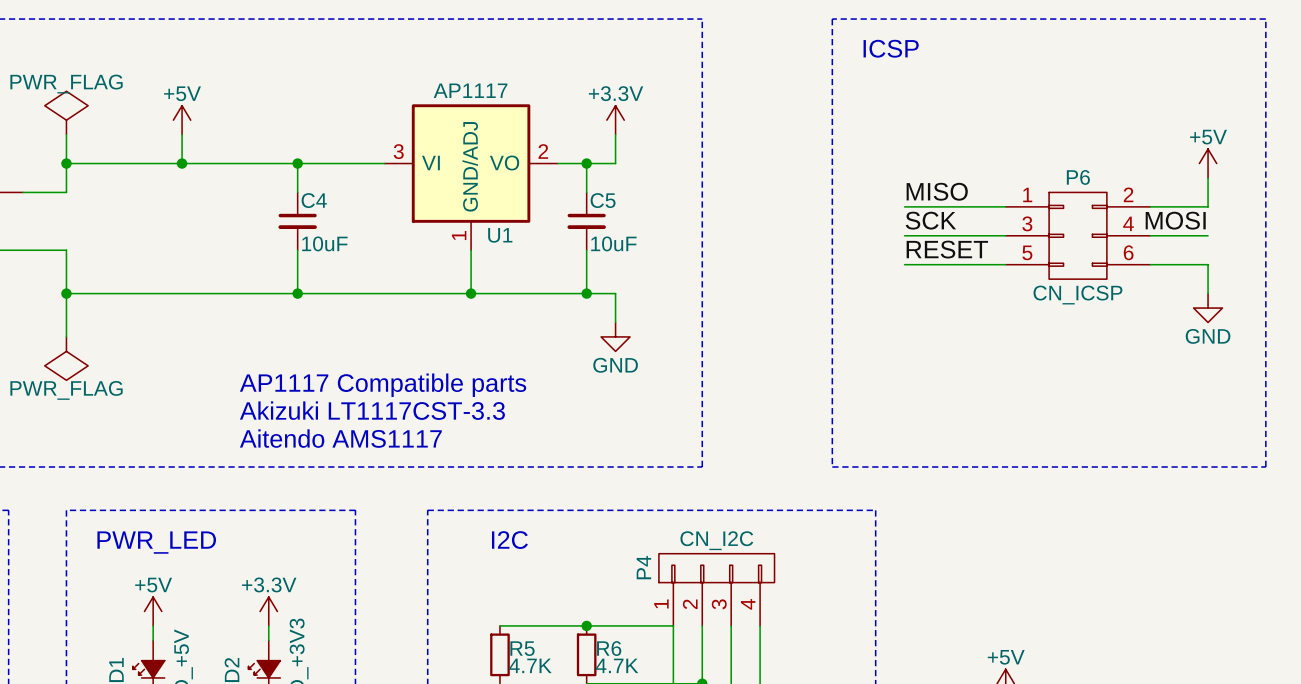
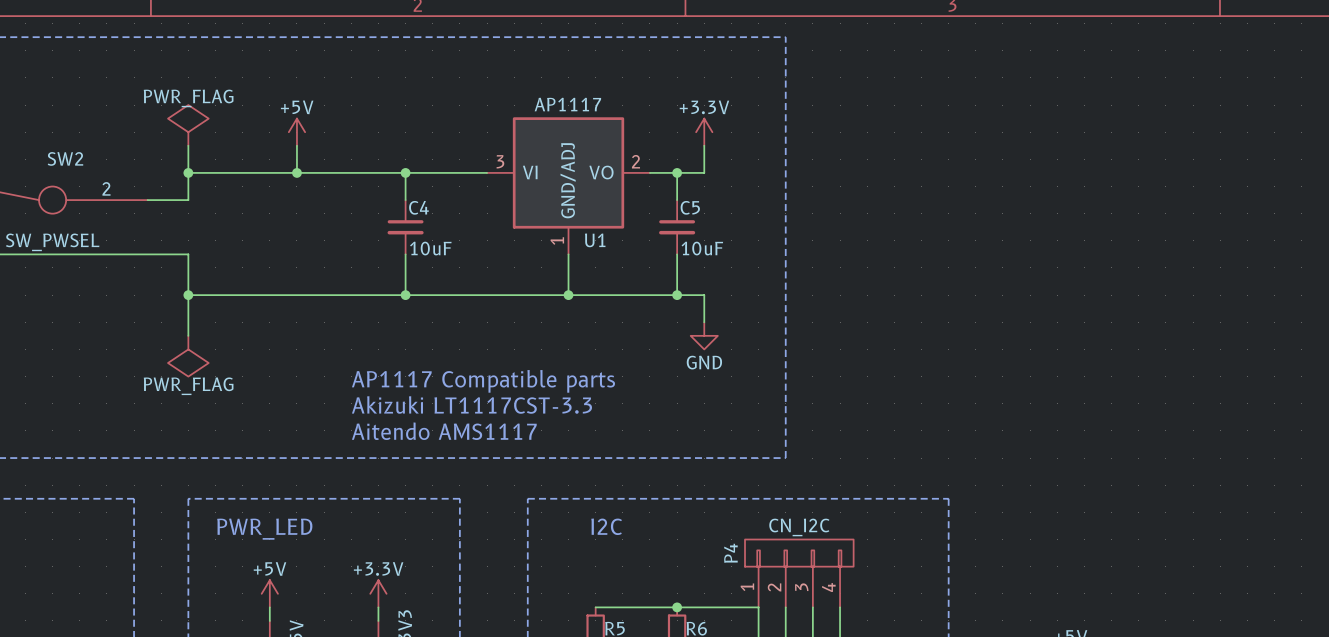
line: (832, 19) (832, 467) (1265, 467) (1265, 19) (832, 19) -> none
text: ICSP (891, 48) -> none
power symbol: +5V (1208, 163) -> none
wire: (1208, 177) (1208, 206) (1150, 206) -> none
label: MISO (937, 191) -> none
wire: (904, 206) (1005, 206) -> none
label: SCK (930, 220) -> none
label: MOSI (1175, 220) -> none
wire: (904, 235) (1005, 235) -> none
P6: CN_ICSP (1077, 235) -> none
wire: (1150, 235) (1208, 235) -> none
label: RESET (947, 249) -> none
wire: (904, 264) (1005, 264) -> none
wire: (1150, 264) (1208, 264) (1208, 293) -> none
power symbol: GND (1208, 308) -> none

